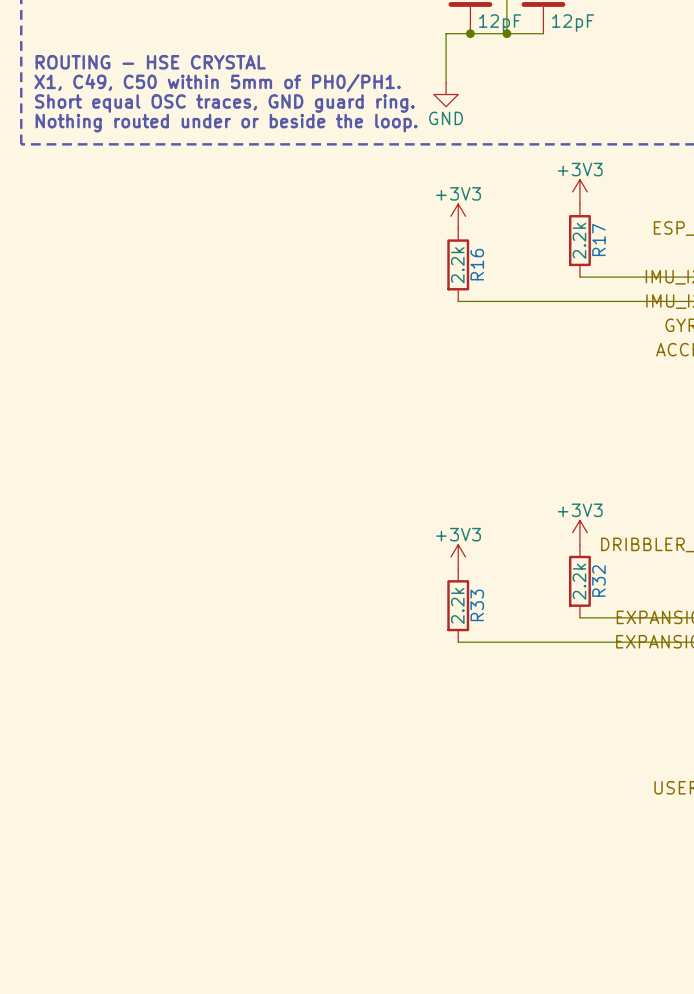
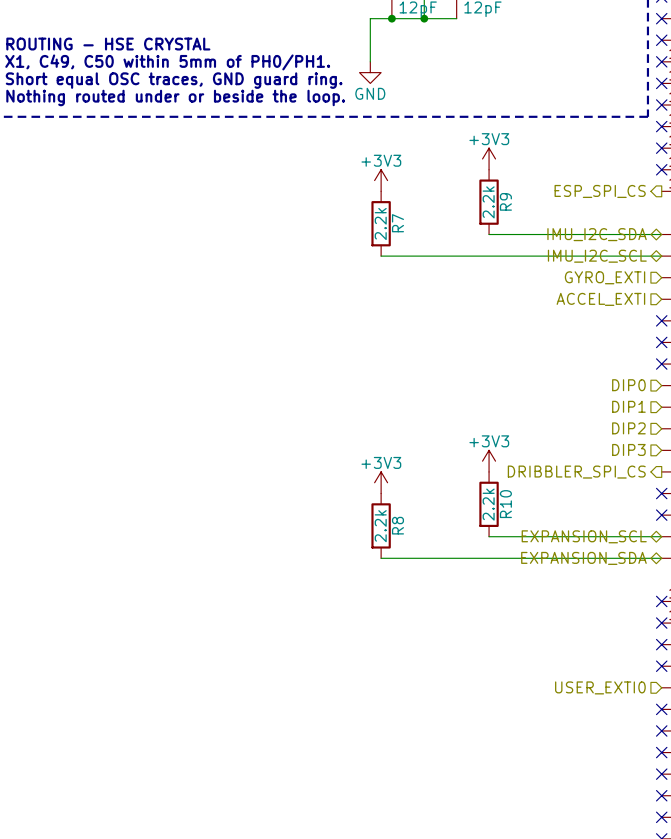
R17 name: R17 (598, 239) -> R9 (505, 201)
R16 name: R16 (477, 264) -> R7 (397, 223)
R32 name: R32 (598, 581) -> R10 (505, 504)
R33 name: R33 (477, 605) -> R8 (397, 525)

